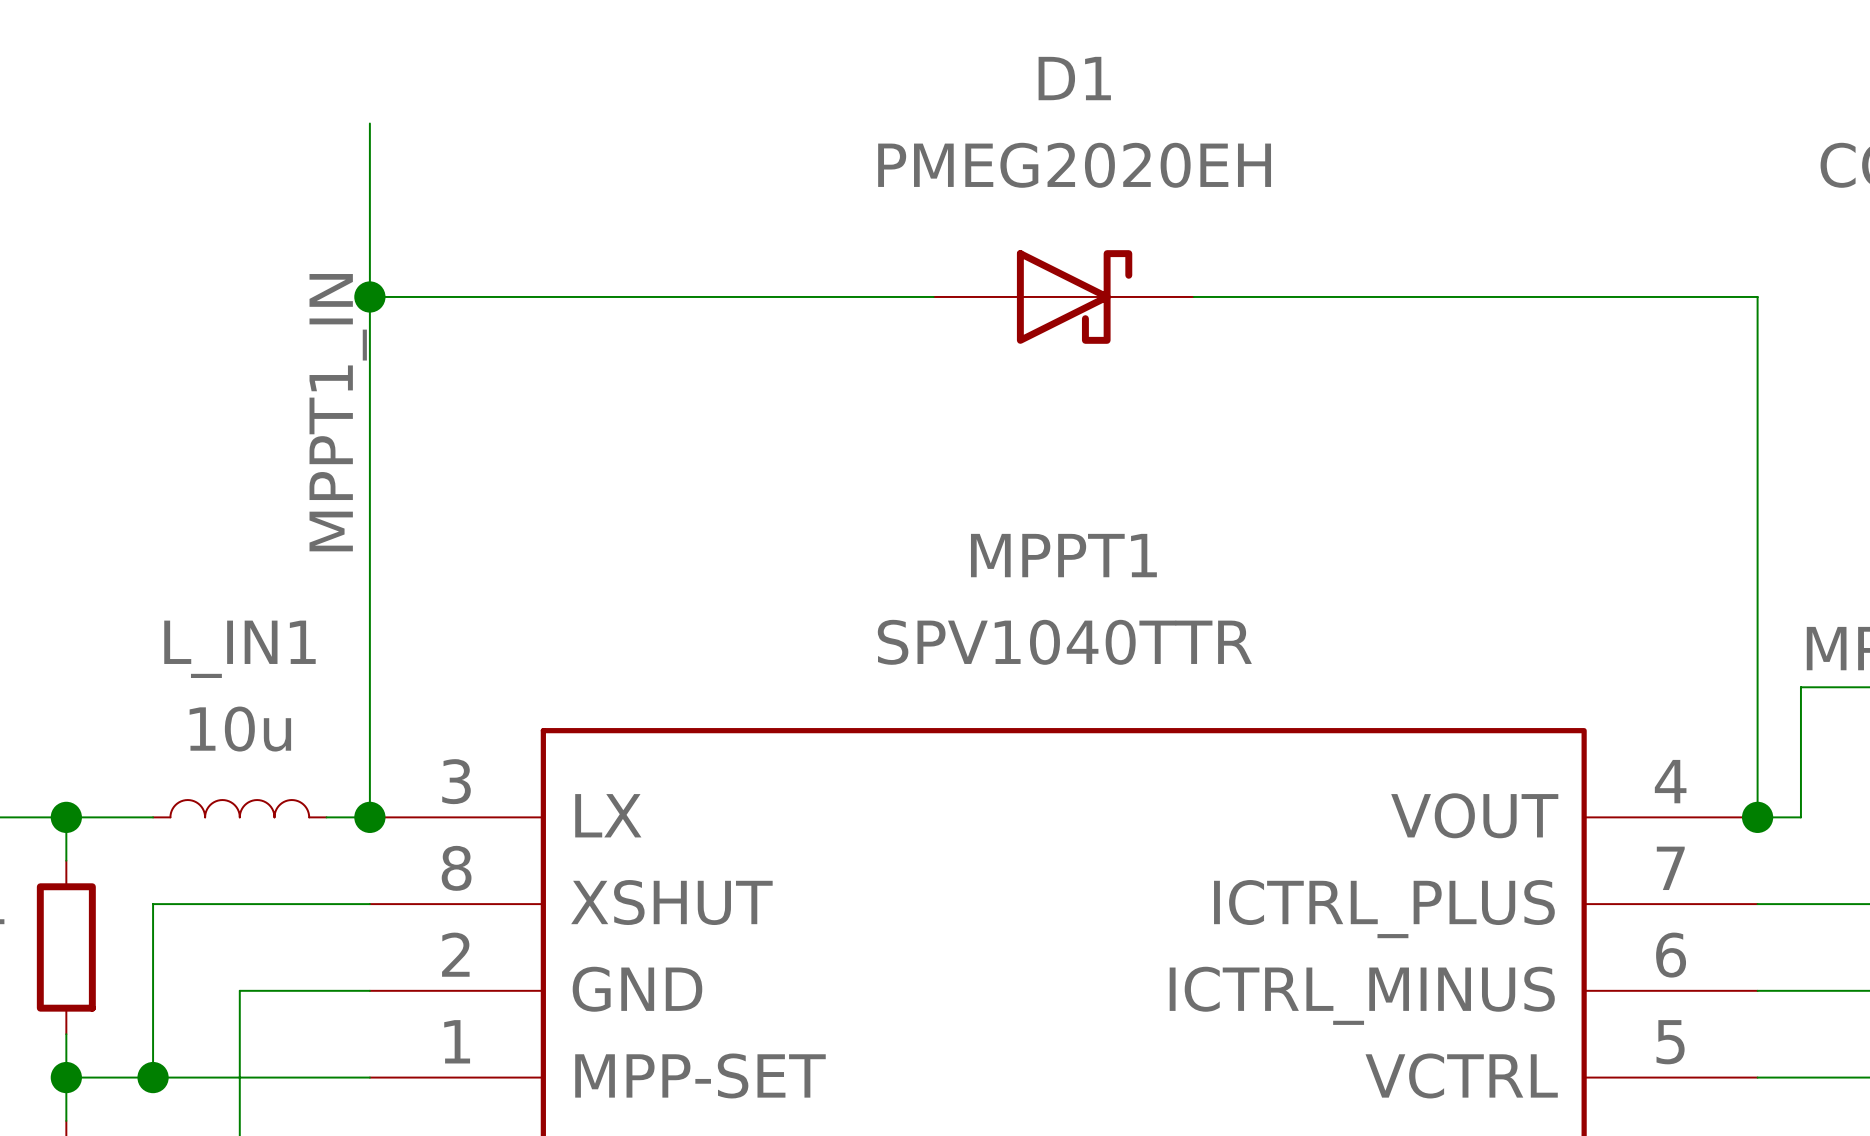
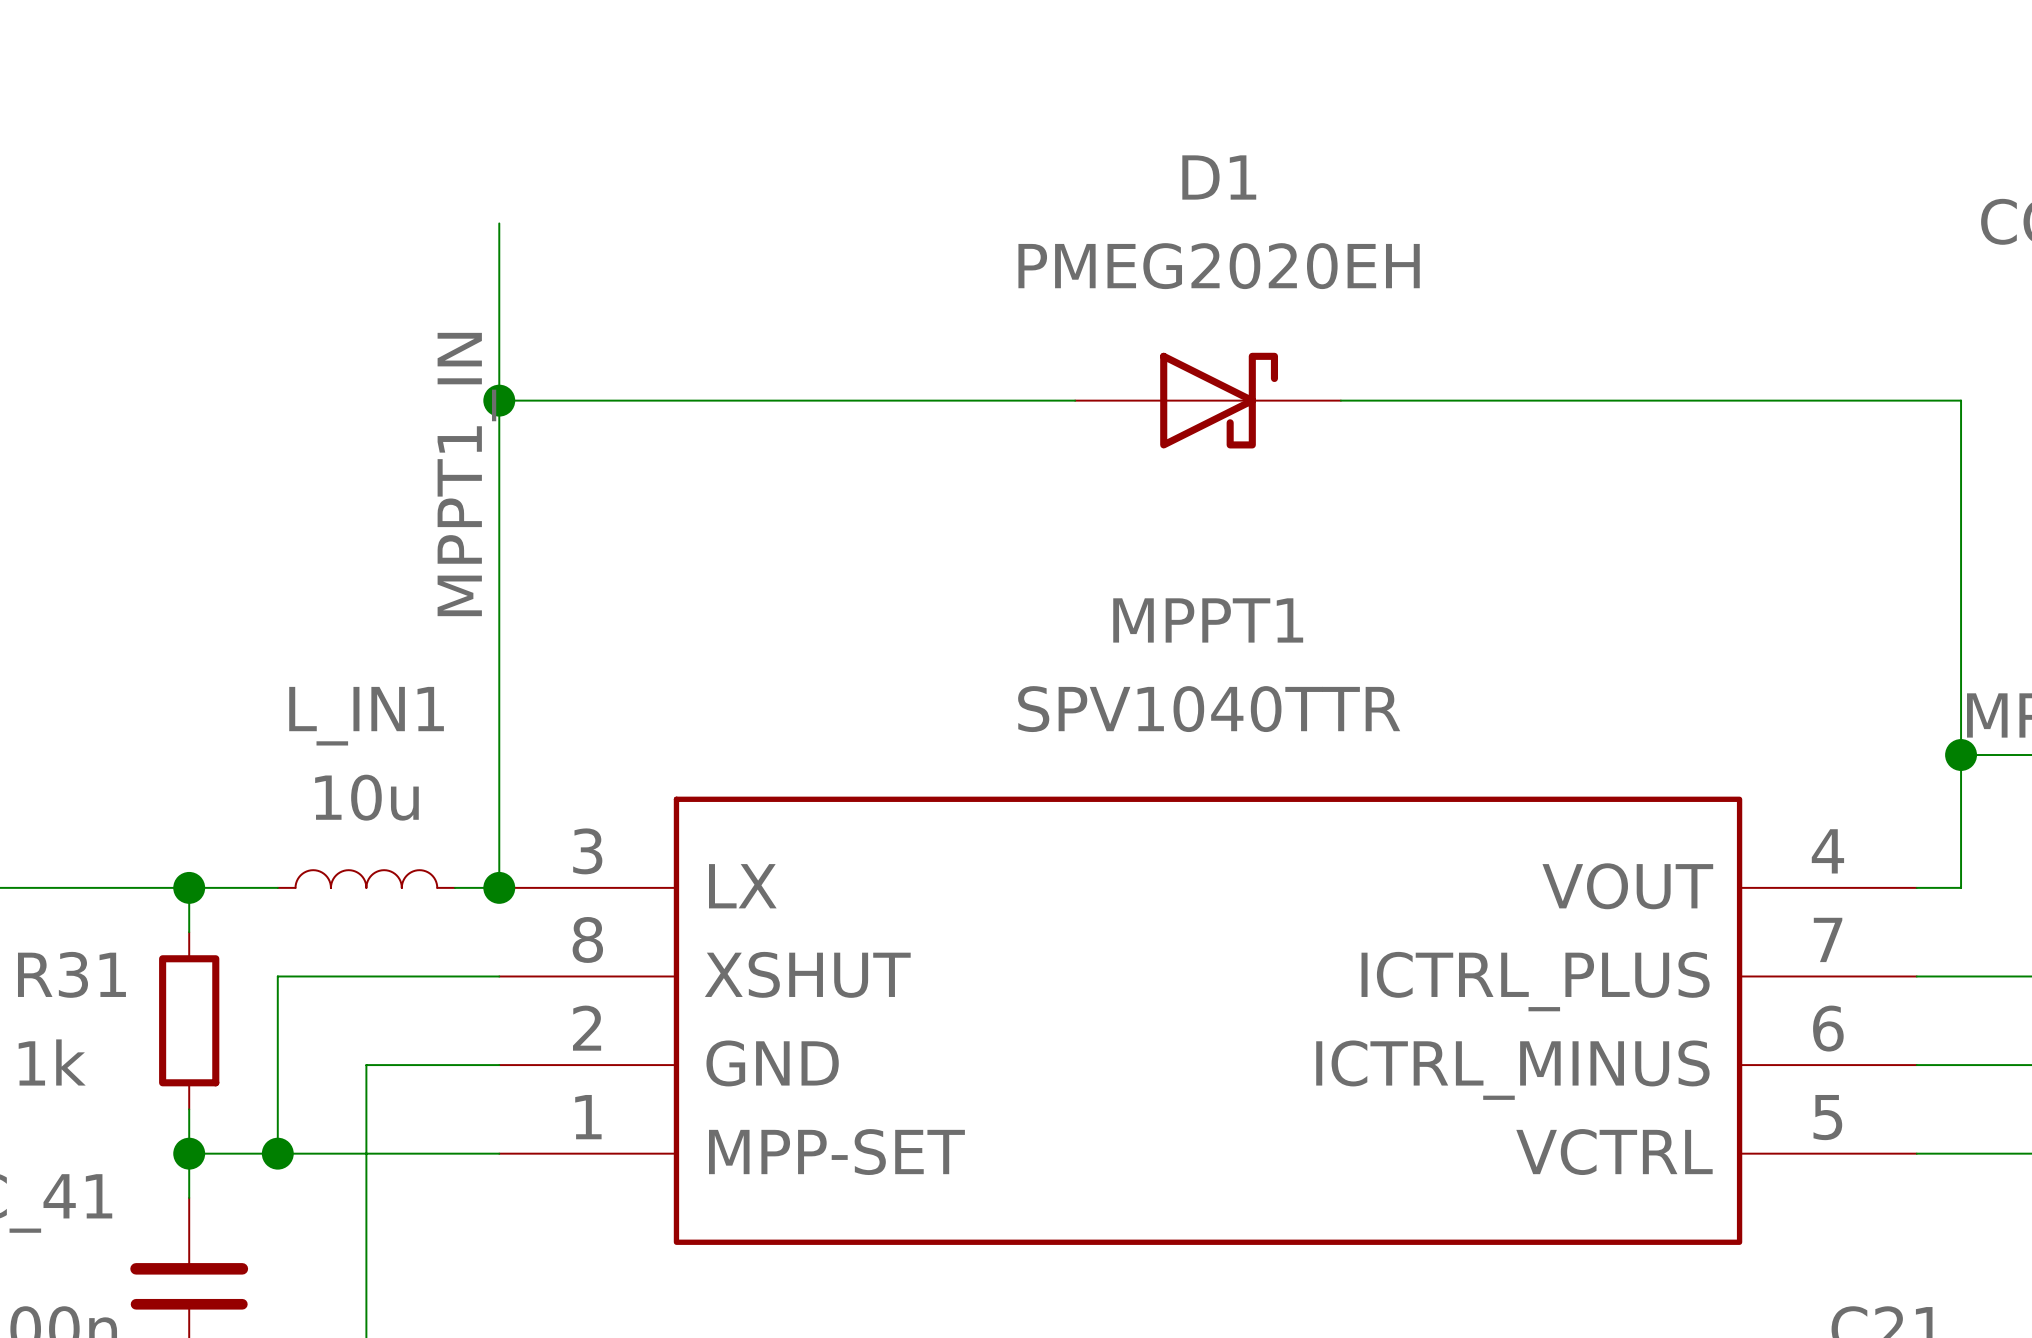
wire: (369, 123) (369, 166) -> none
wire: (369, 296) (933, 296) -> (499, 400) (1075, 400)
junction position: (369, 296) -> (499, 400)
D1 position: (1063, 296) -> (1208, 400)
wire: (1193, 296) (1757, 296) (1757, 817) -> none
wire: none -> (1340, 400) (1961, 400) (1961, 755)
junction position: (1757, 817) -> (1961, 755)

